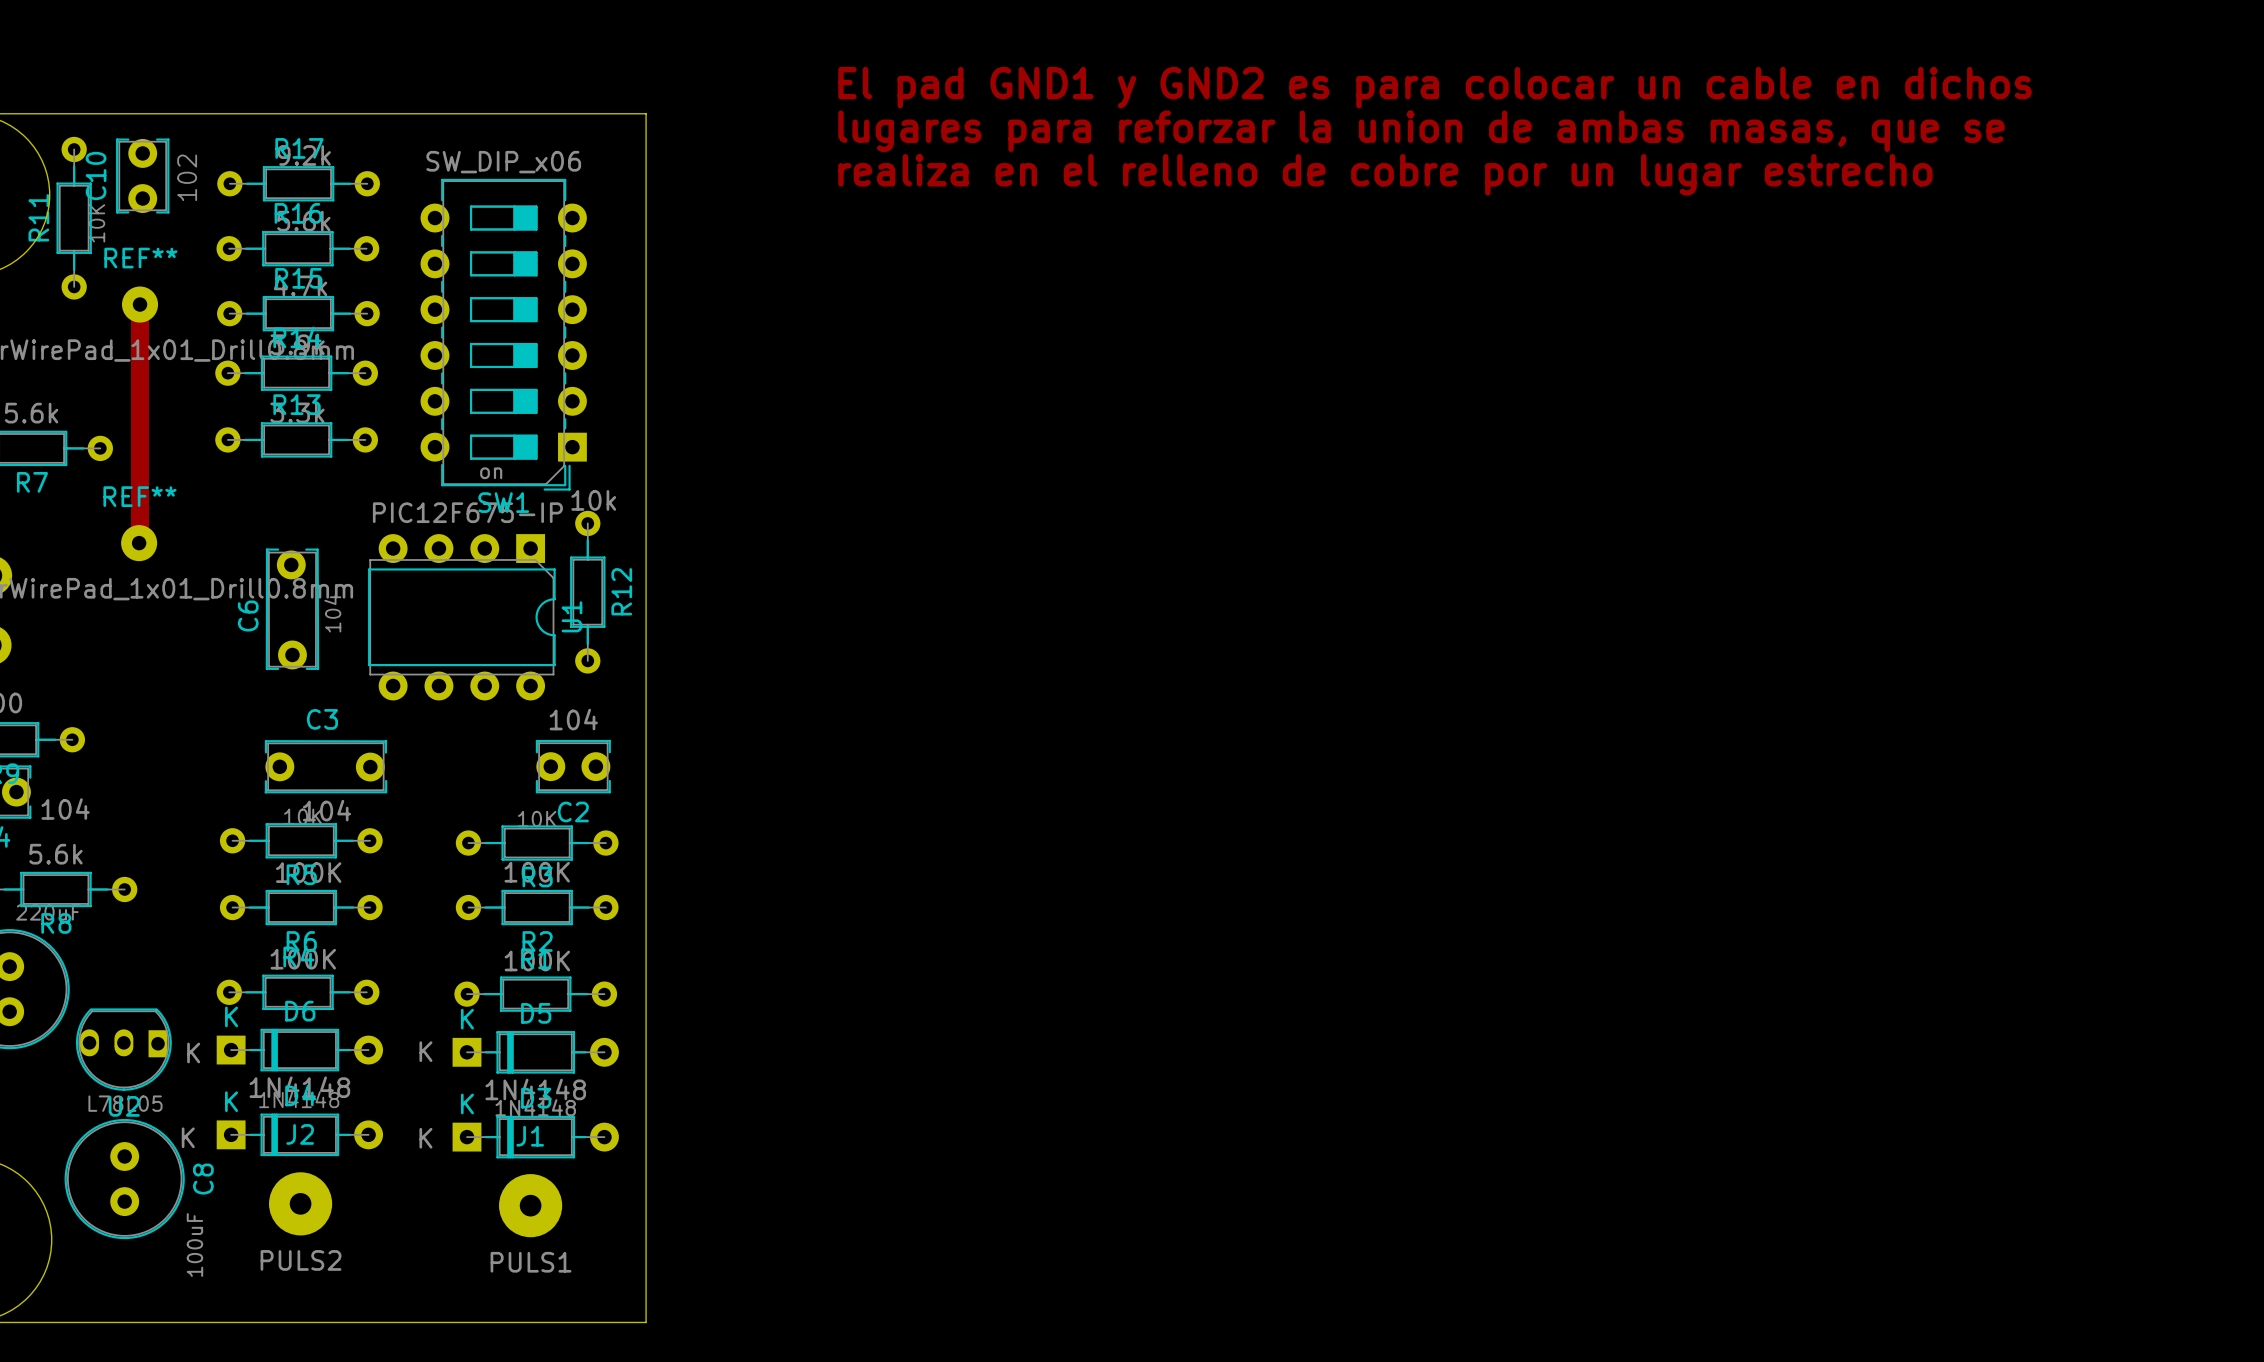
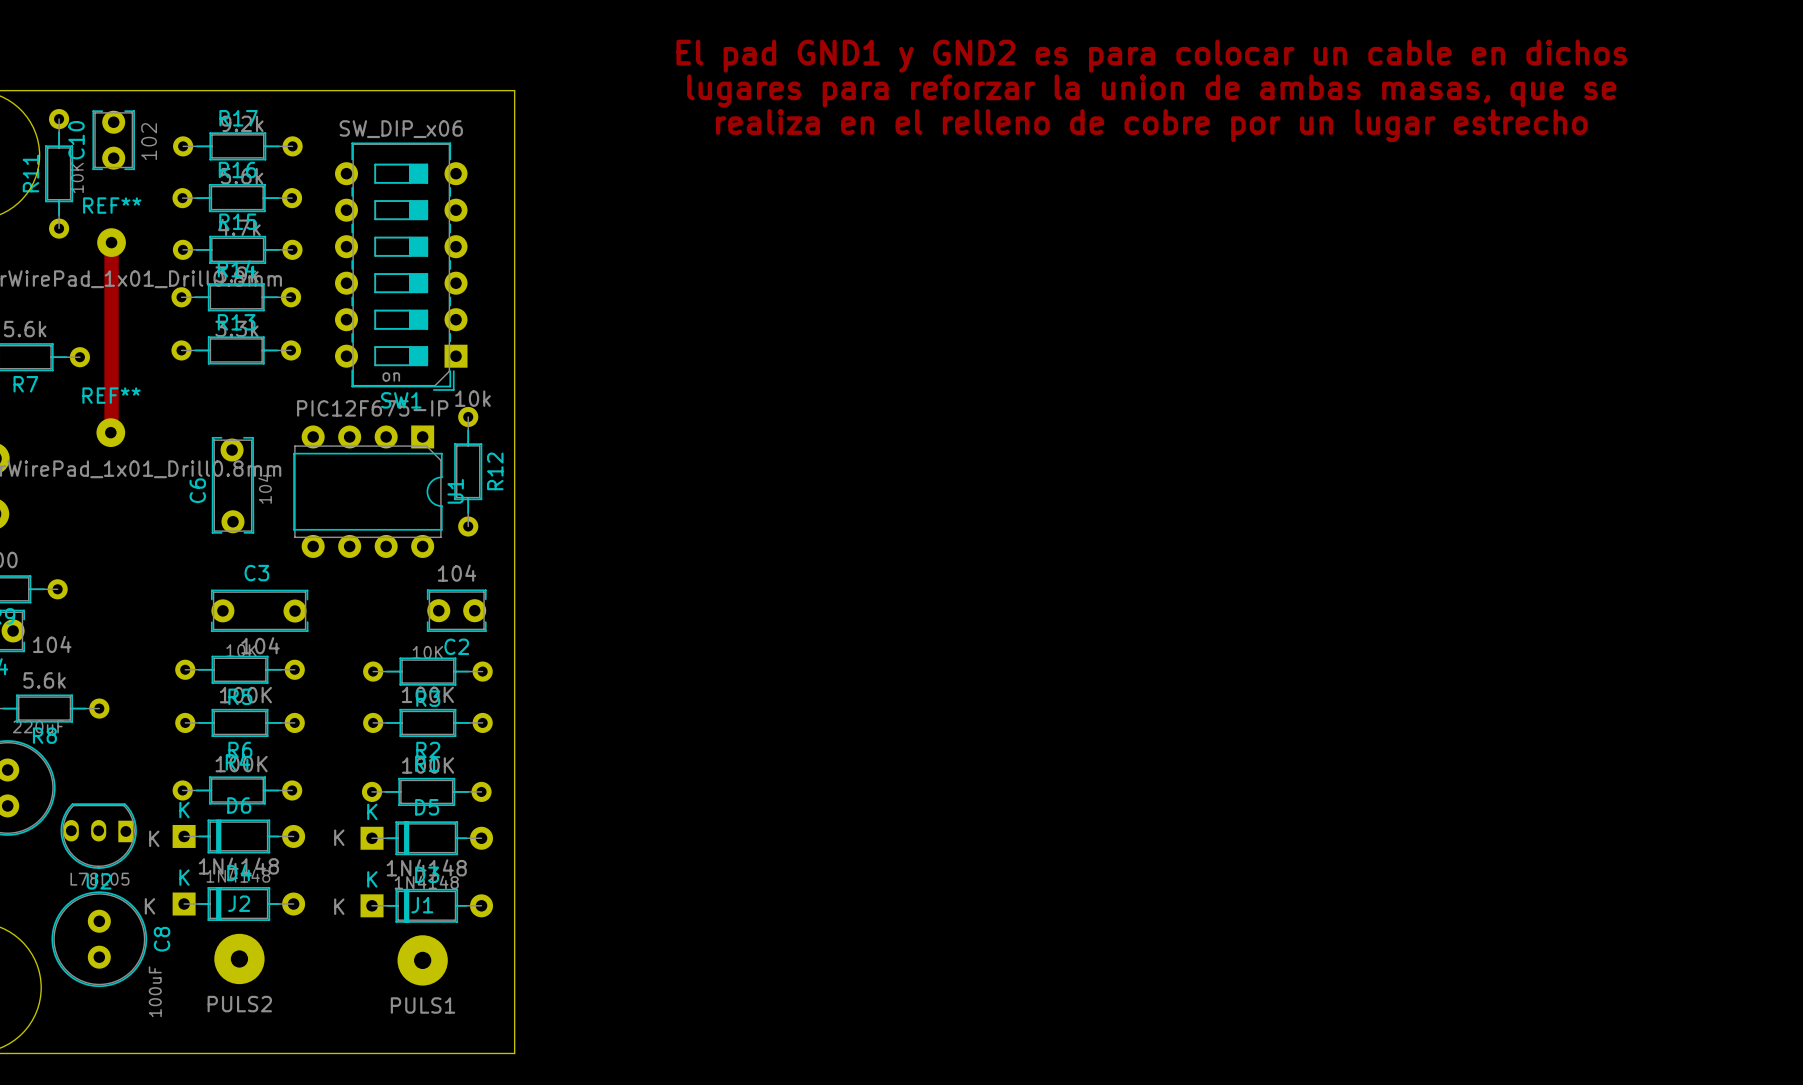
text: none -> El pad GND1 y GND2 es para colocar un cable en dichos (1151, 56)
text: El pad GND1 y GND2 es para colocar un cable en dichos (1435, 87) -> none
text: none -> lugares para reforzar la union de ambas masas, que se (1151, 90)
text: lugares para reforzar la union de ambas masas, que se (1421, 131) -> none
text: none -> realiza en el relleno de cobre por un lugar estrecho (1151, 125)
text: realiza en el relleno de cobre por un lugar estrecho (1385, 174) -> none

